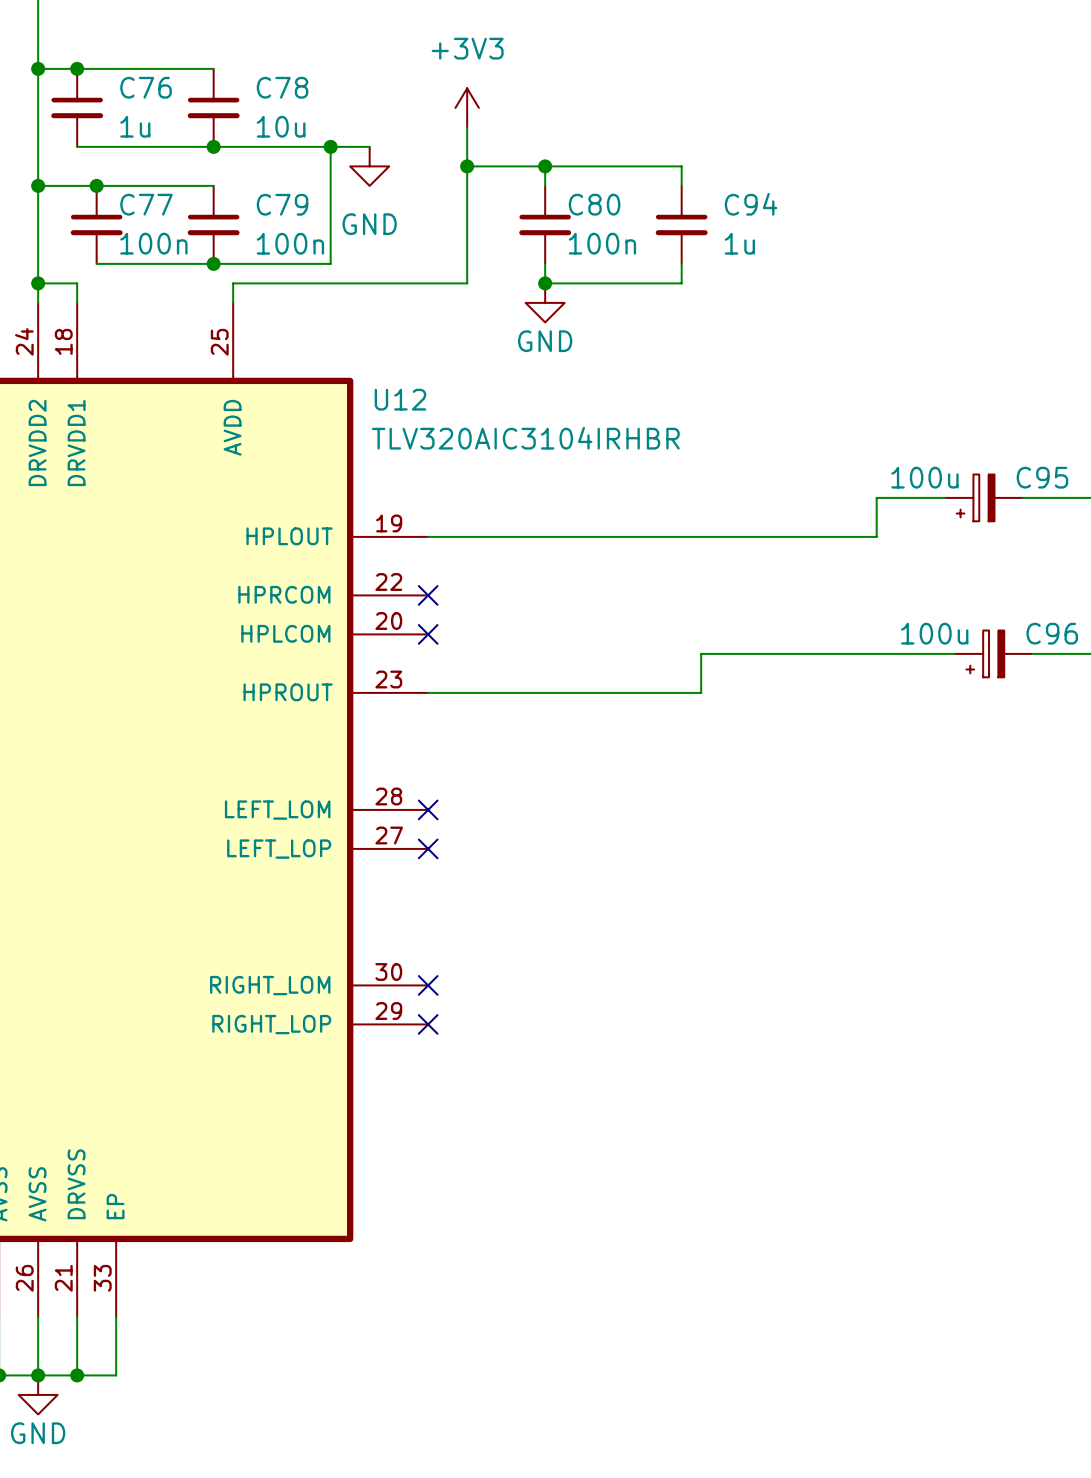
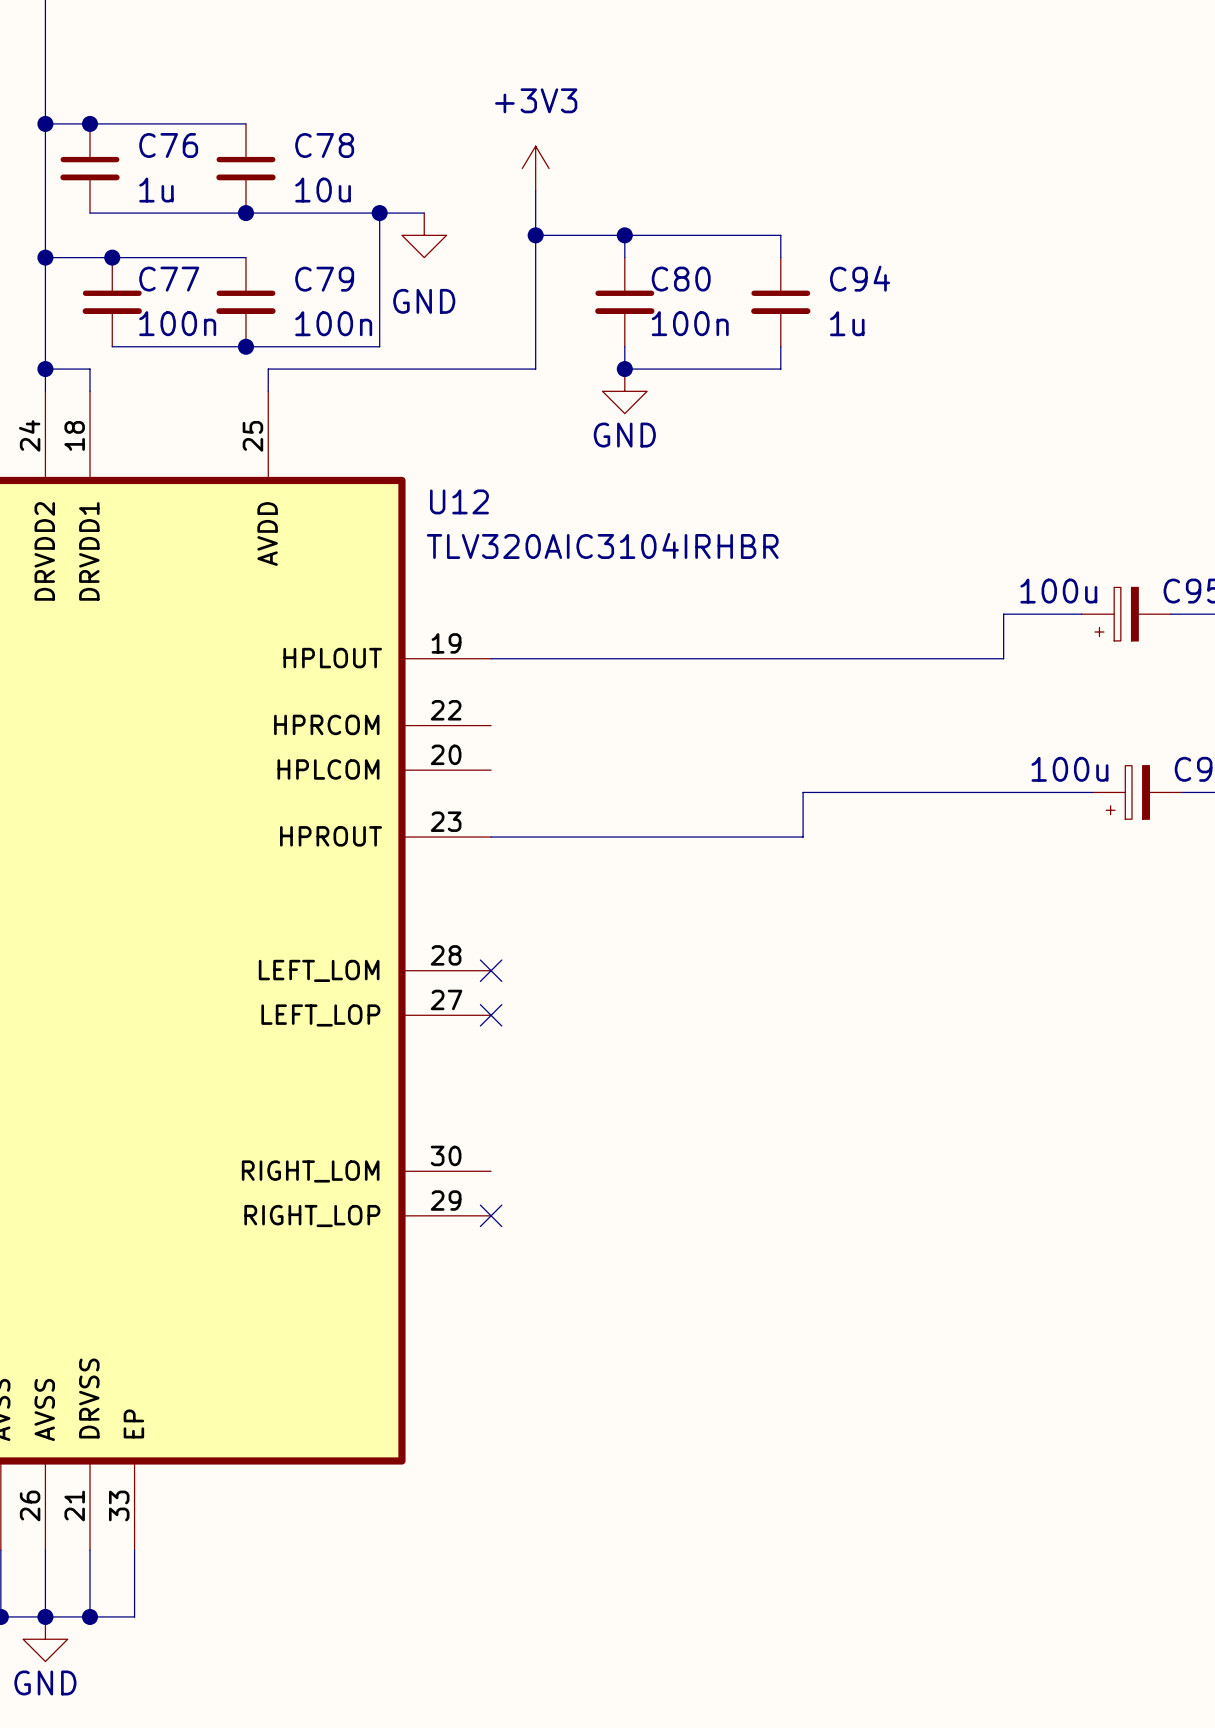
no-connect mark: (428, 595) -> none
no-connect mark: (428, 634) -> none
no-connect mark: (428, 985) -> none

